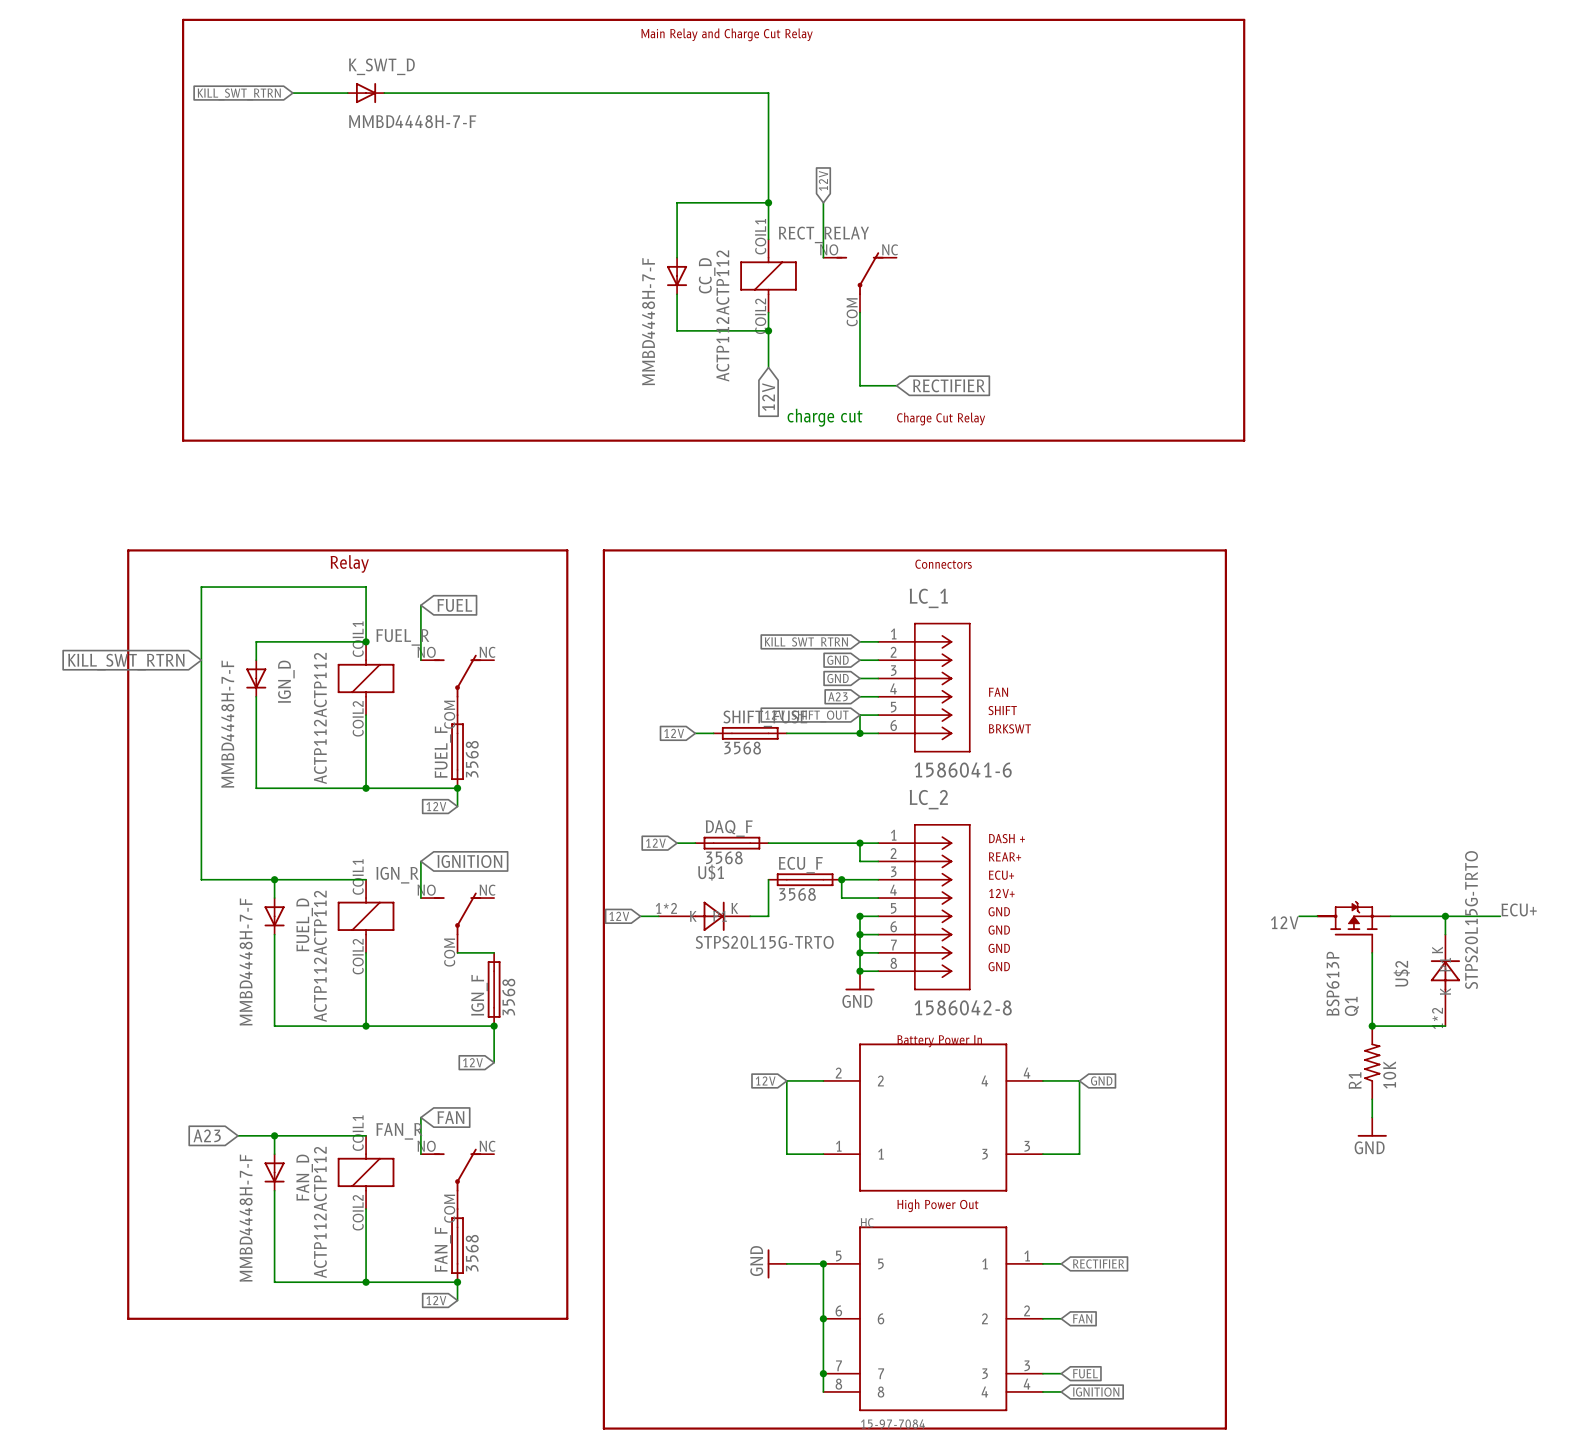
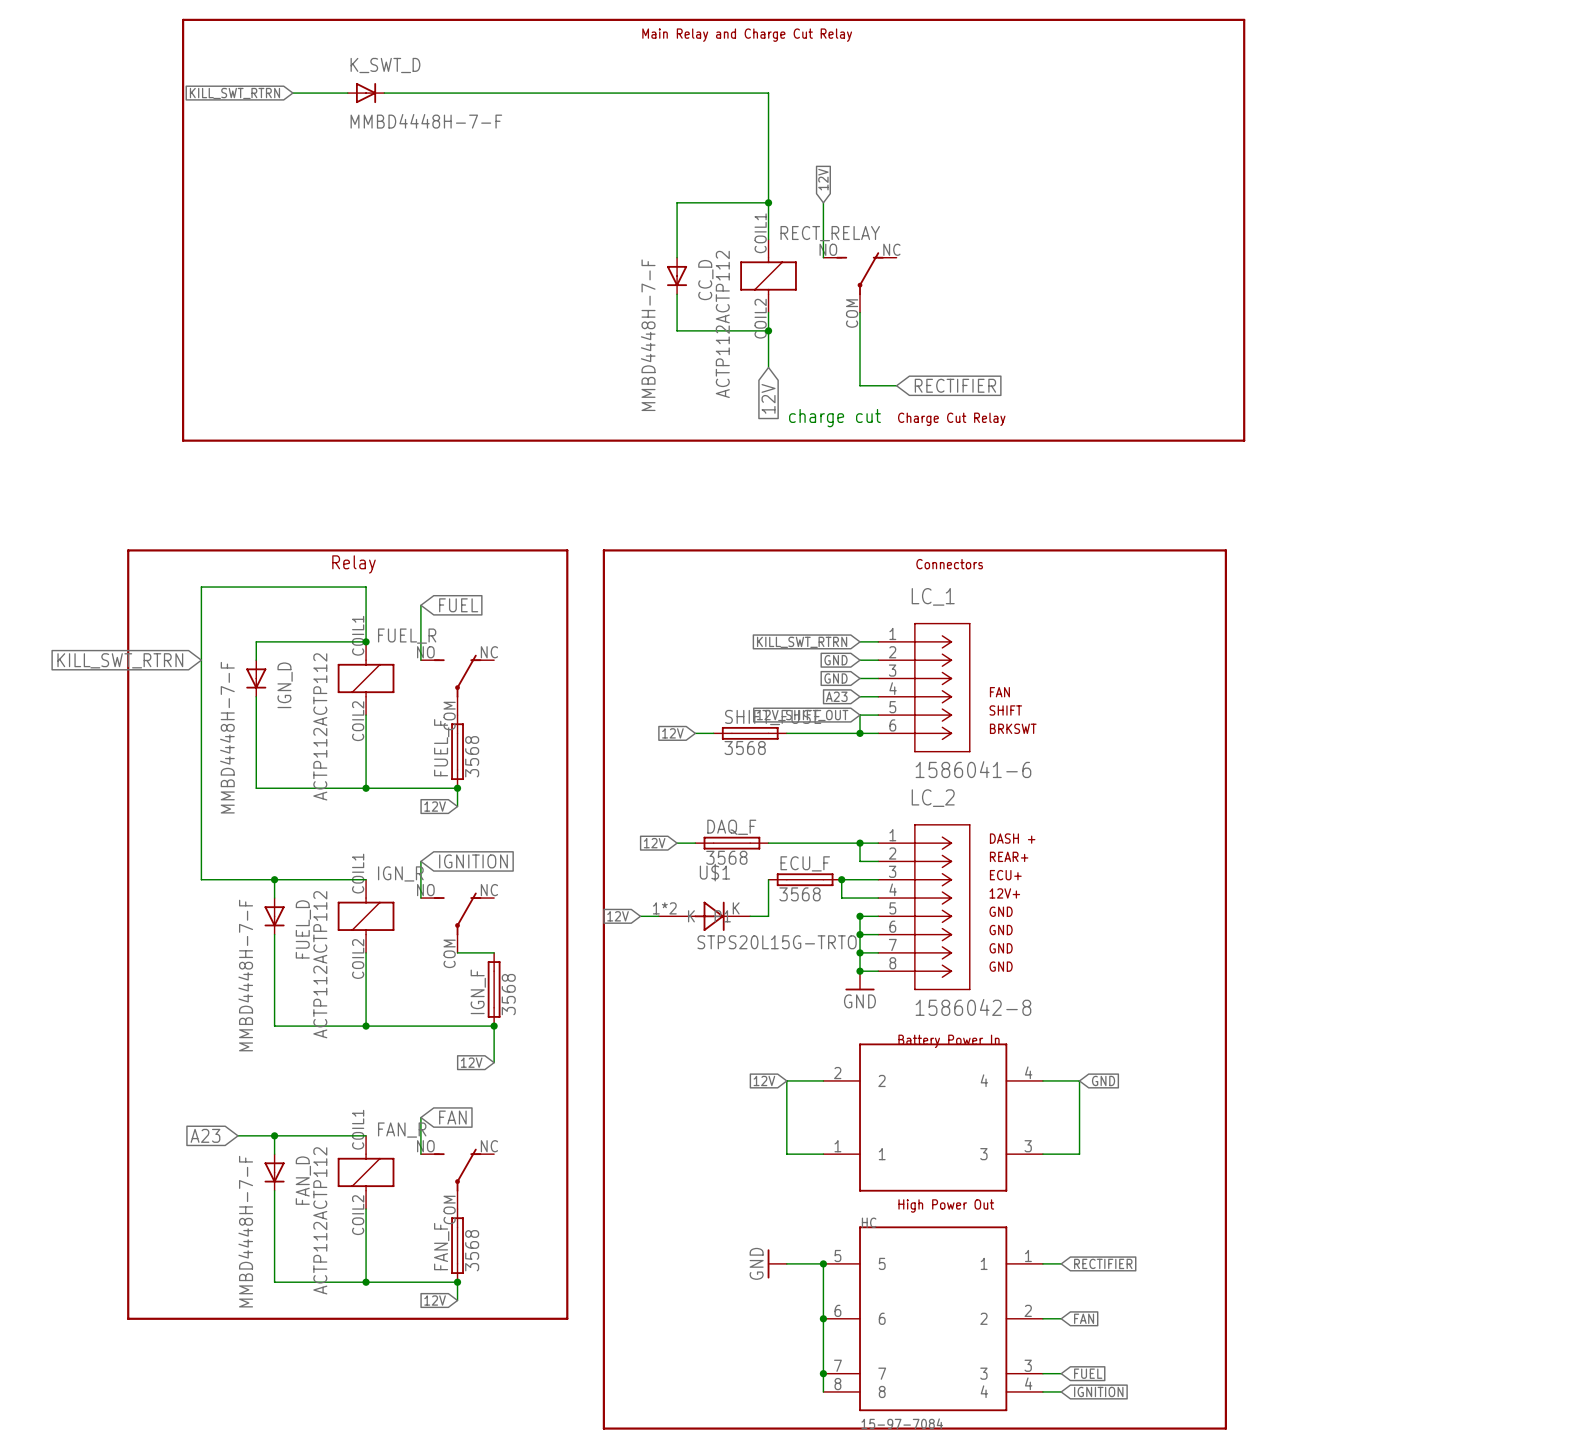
label: ECU+ (1519, 909) -> none
wire: (1299, 916) (1317, 916) -> none
wire: (1390, 916) (1500, 916) -> none
wire: (1445, 916) (1445, 934) -> none
junction: (1445, 916) -> none
label: 12V (1284, 922) -> none
Q1: BSP613P (1353, 927) -> none
wire: (1372, 952) (1372, 1026) (1445, 1026) -> none
U$2: STPS20L15G-TRTO (1445, 980) -> none
junction: (1372, 1026) -> none
R1: 10K (1372, 1062) -> none
wire: (1372, 1099) (1372, 1117) -> none
power symbol: GND (1372, 1127) -> none

